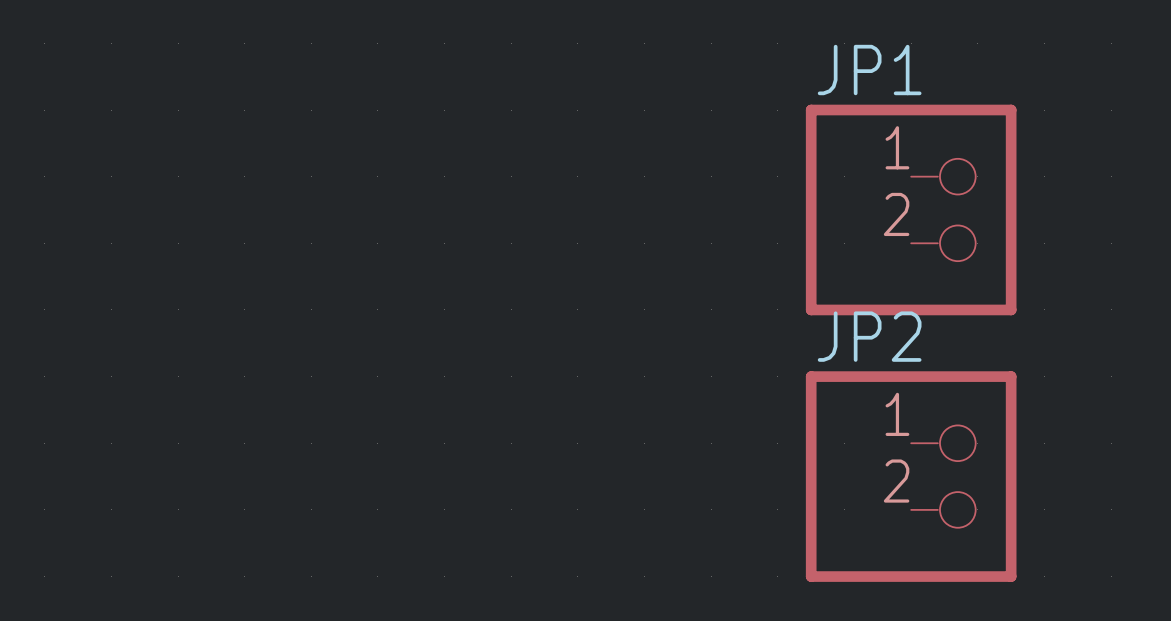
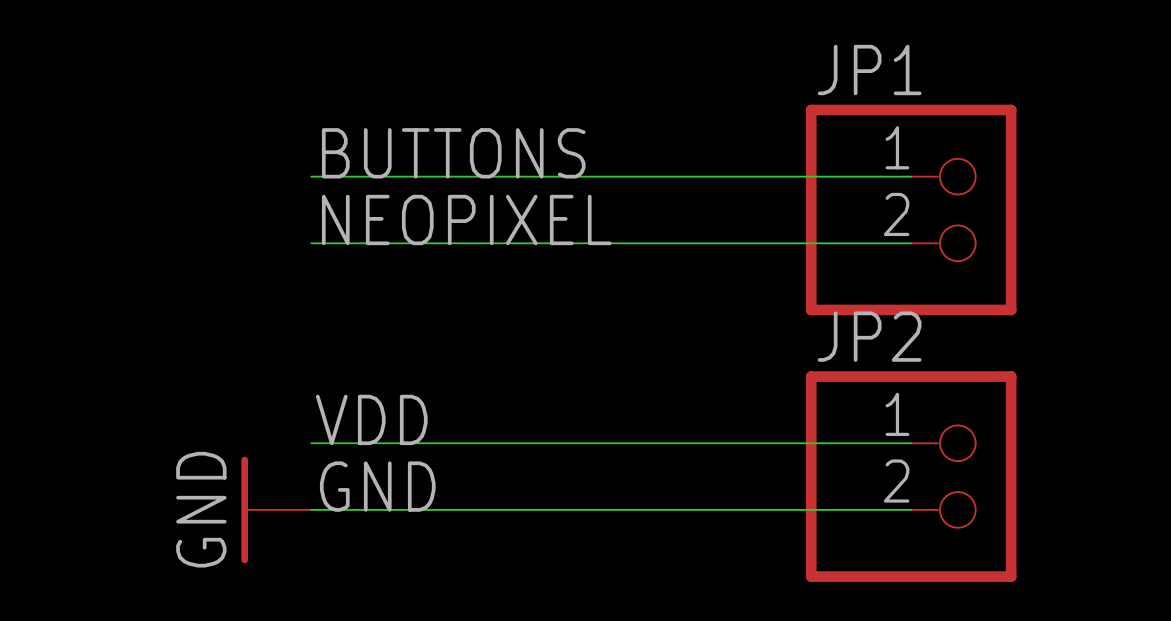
label: none -> BUTTONS (453, 153)
wire: none -> (311, 176) (911, 176)
label: none -> NEOPIXEL (466, 219)
wire: none -> (311, 243) (911, 243)
label: none -> VDD (371, 419)
wire: none -> (311, 443) (911, 443)
label: none -> GND (377, 486)
power symbol: none -> GND (276, 509)
wire: none -> (311, 509) (911, 509)

